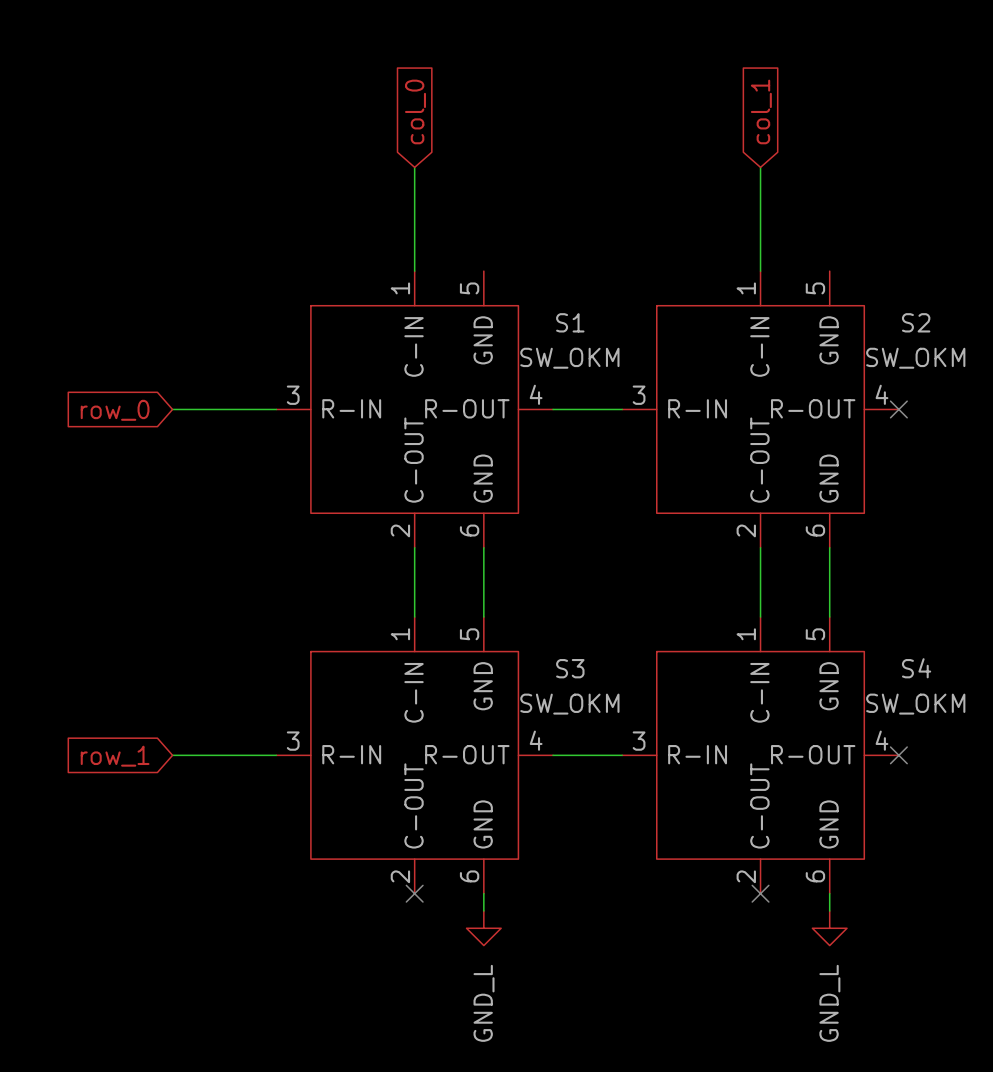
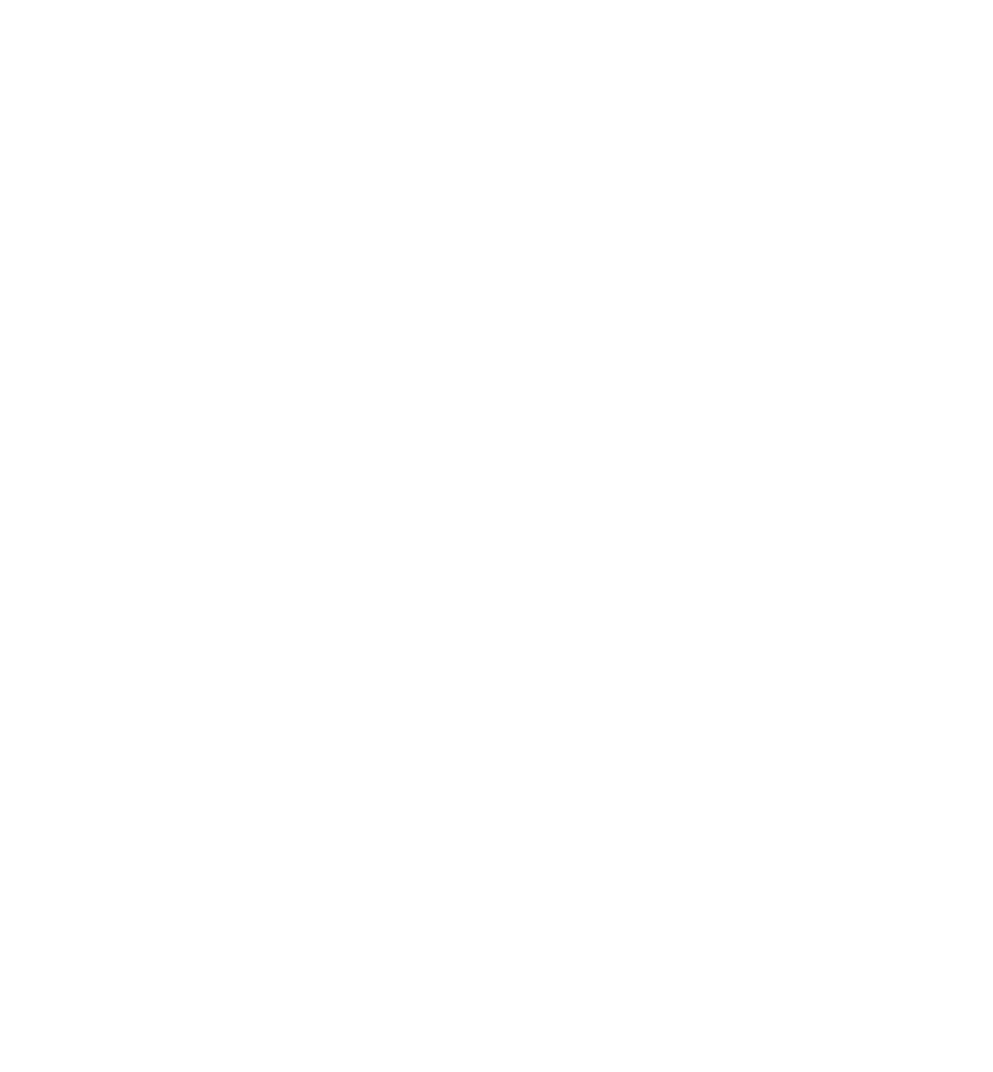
global label: col_0 (415, 111) -> none
global label: col_1 (761, 111) -> none
wire: (414, 167) (414, 271) -> none
wire: (760, 167) (760, 271) -> none
wire: (172, 409) (276, 409) -> none
S1: SW_OKM (414, 409) -> none
wire: (553, 409) (622, 409) -> none
S2: SW_OKM (760, 409) -> none
no-connect mark: (898, 409) -> none
global label: row_0 (115, 410) -> none
wire: (414, 547) (414, 617) -> none
wire: (483, 547) (483, 617) -> none
wire: (760, 547) (760, 617) -> none
wire: (829, 547) (829, 617) -> none
wire: (172, 755) (276, 755) -> none
S3: SW_OKM (414, 755) -> none
wire: (553, 755) (622, 755) -> none
S4: SW_OKM (760, 755) -> none
no-connect mark: (898, 755) -> none
global label: row_1 (115, 756) -> none
no-connect mark: (414, 893) -> none
wire: (483, 893) (483, 910) -> none
no-connect mark: (760, 893) -> none
wire: (829, 893) (829, 910) -> none
power symbol: GND_L (483, 928) -> none
power symbol: GND_L (829, 928) -> none

